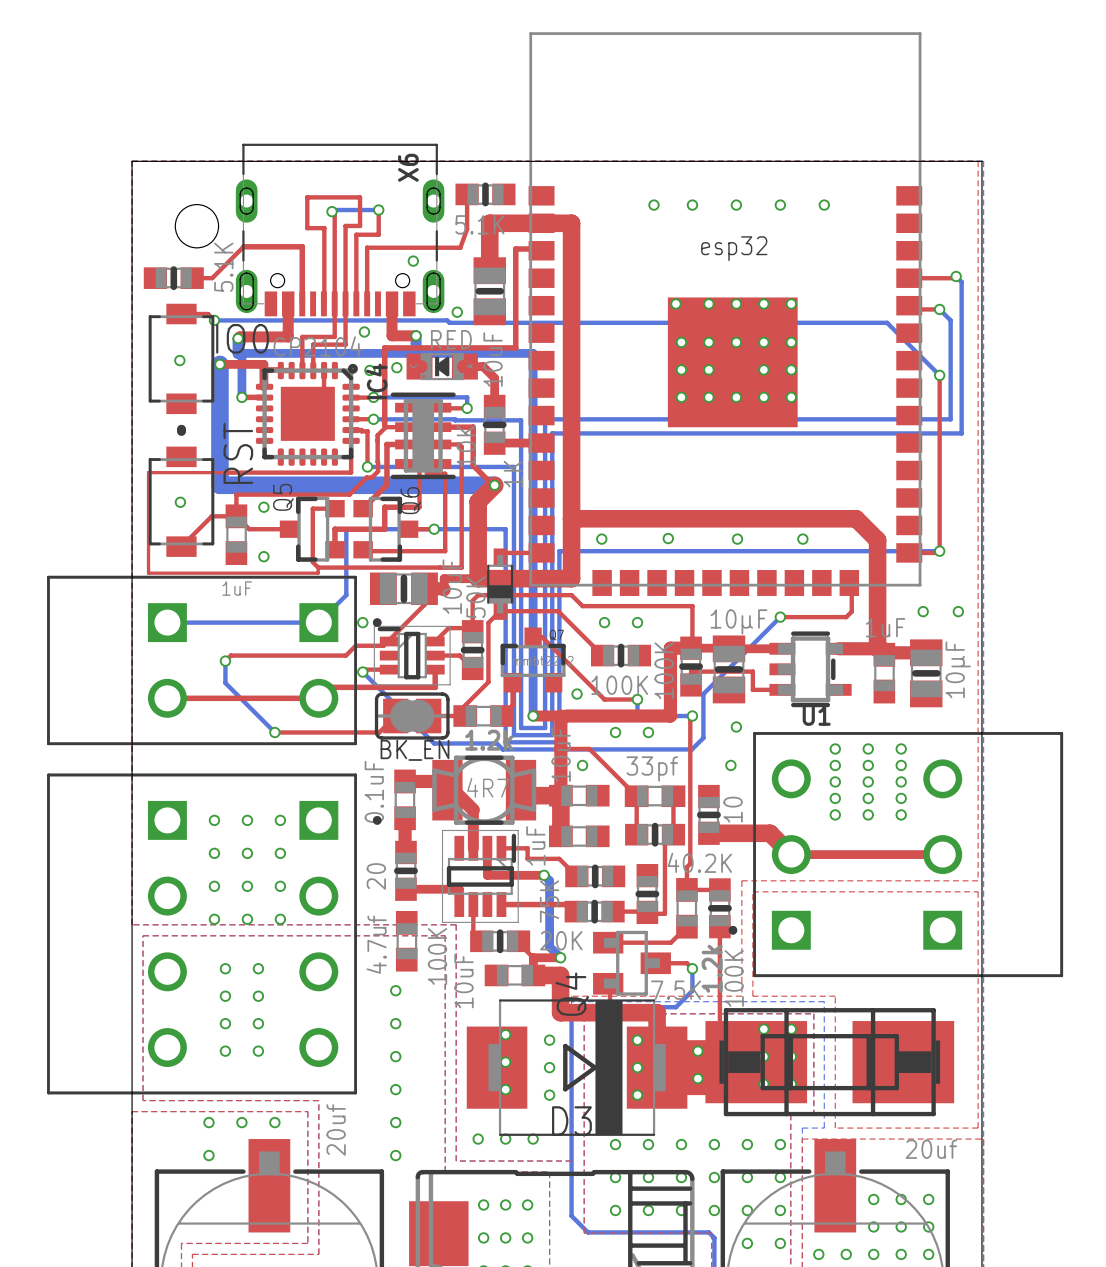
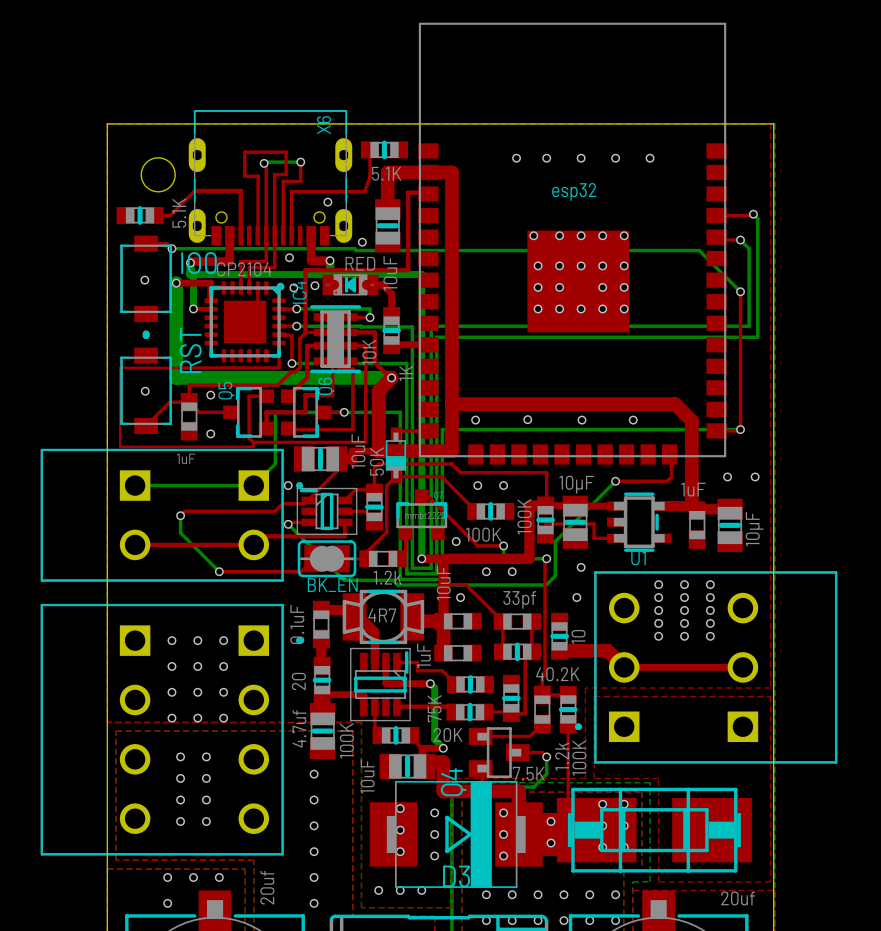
part footprint: [395, 910, 418, 972] -> [309, 703, 336, 760]
part footprint: [484, 964, 546, 987] -> [379, 753, 436, 780]

